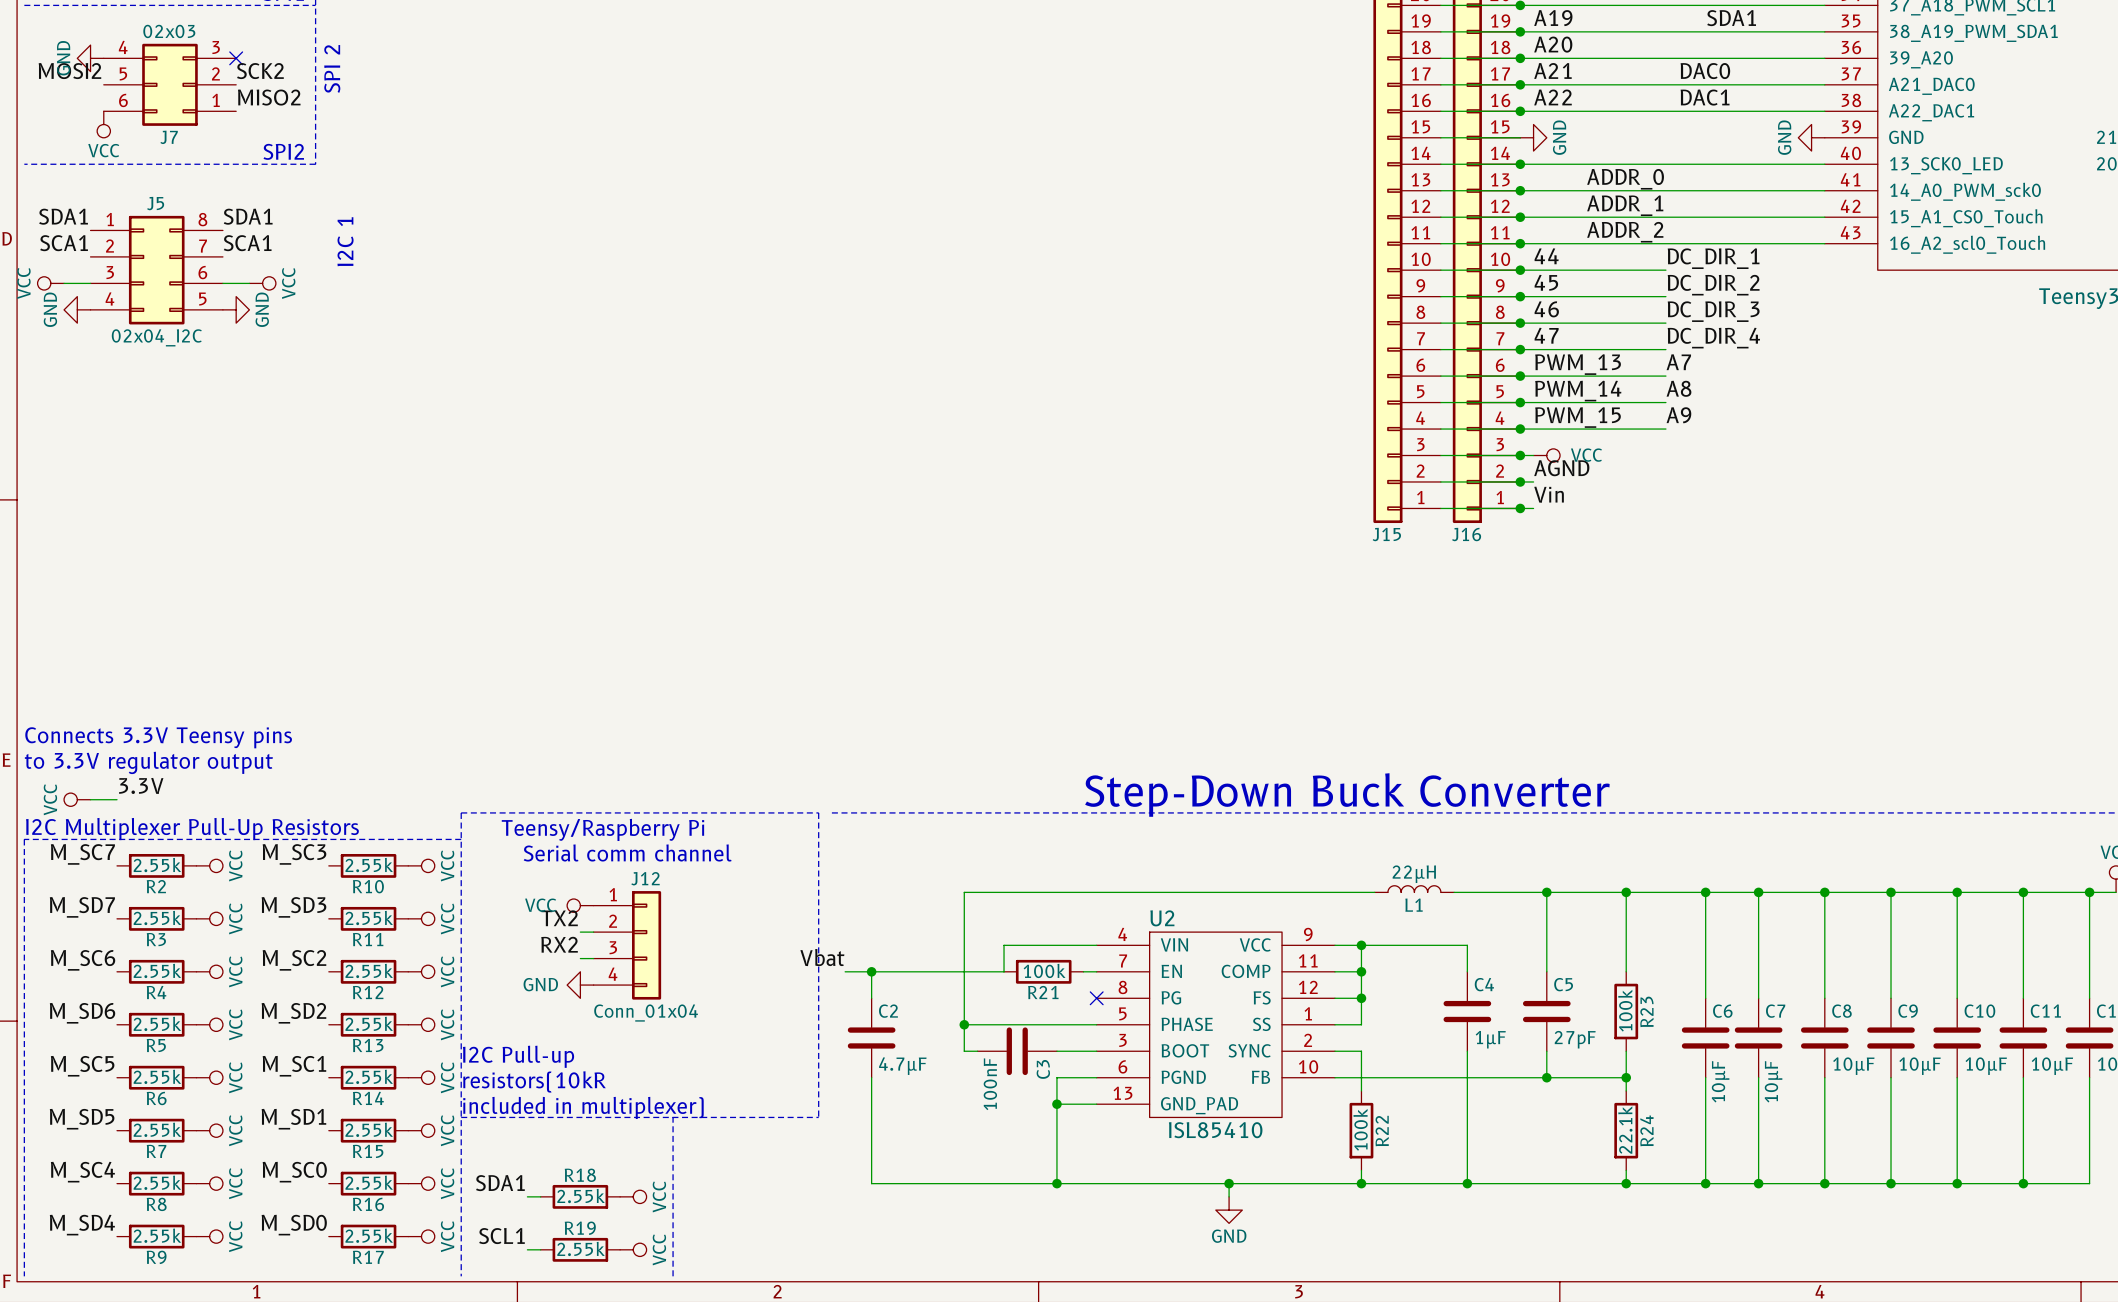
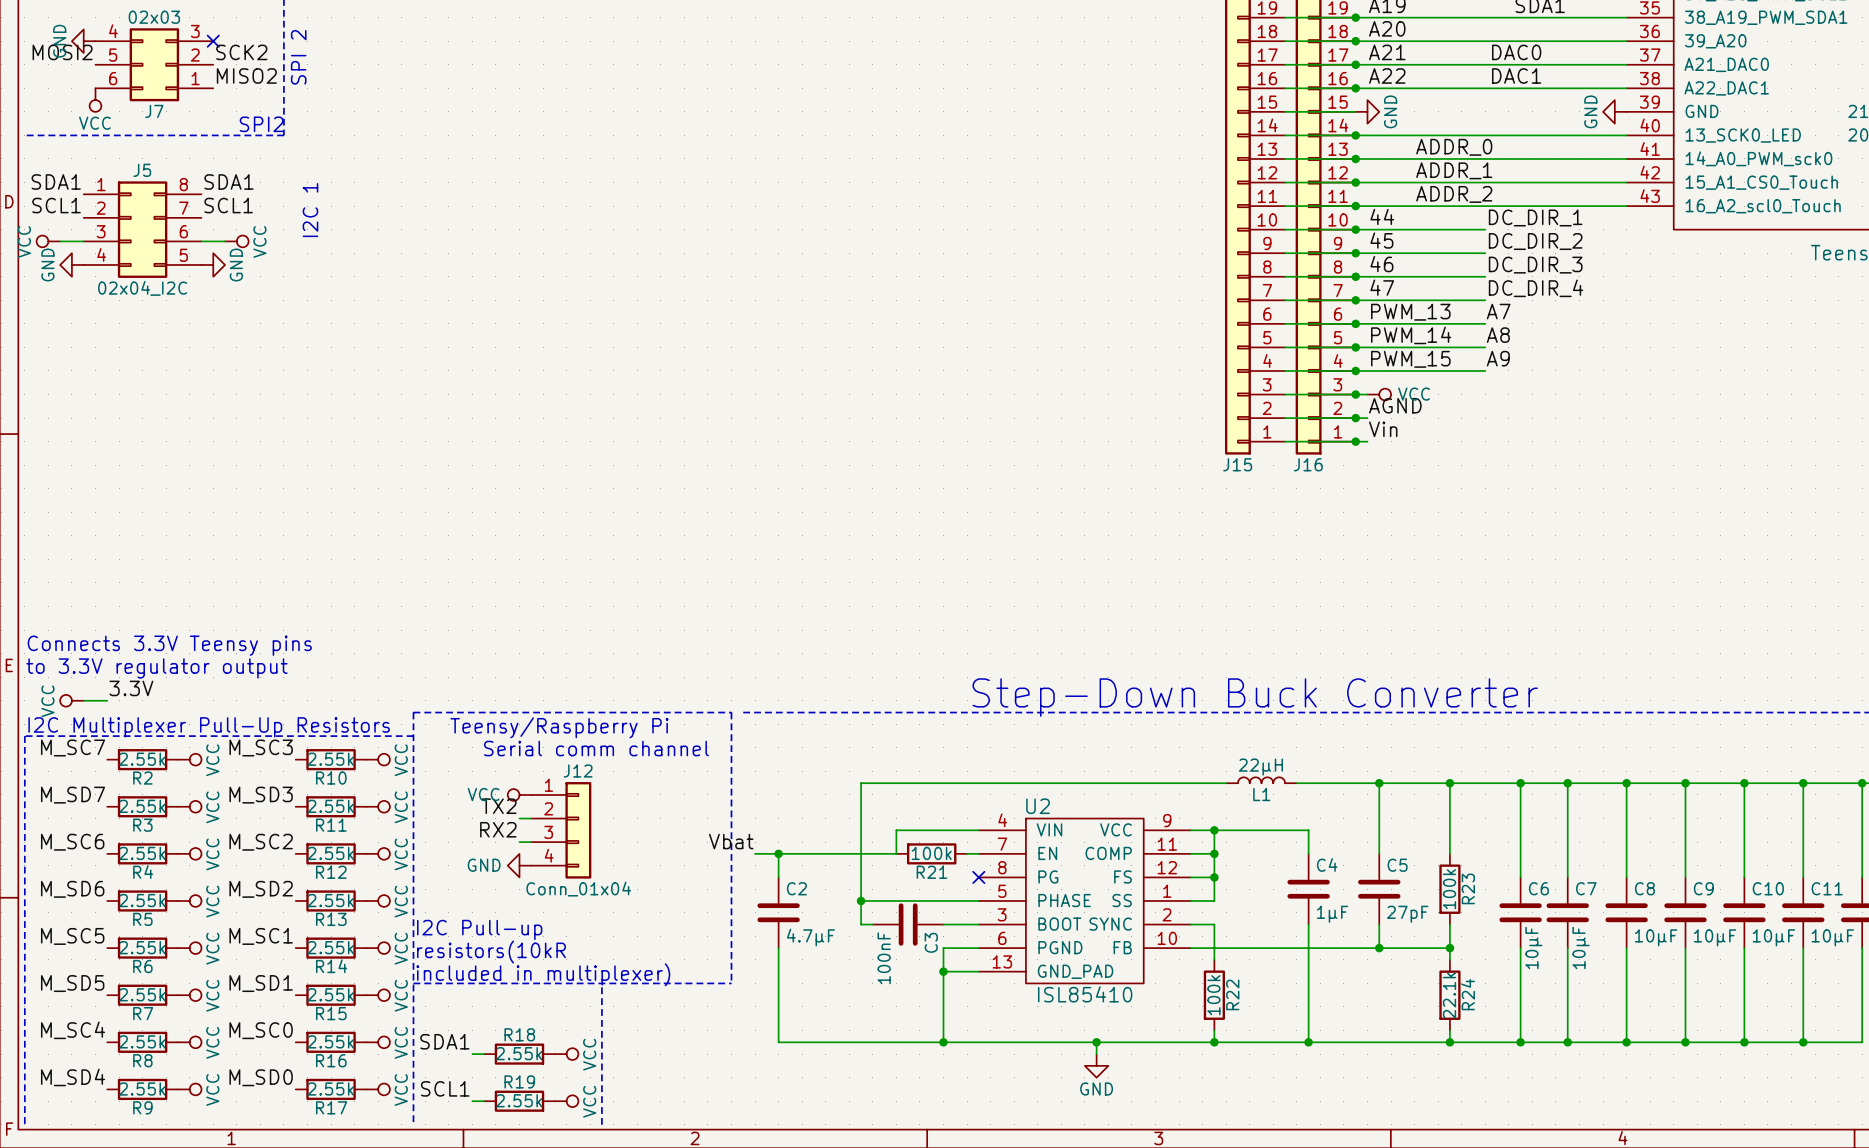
label: SCA1 (64, 243) -> SCL1 (56, 205)
label: SCA1 (247, 243) -> SCL1 (228, 205)

